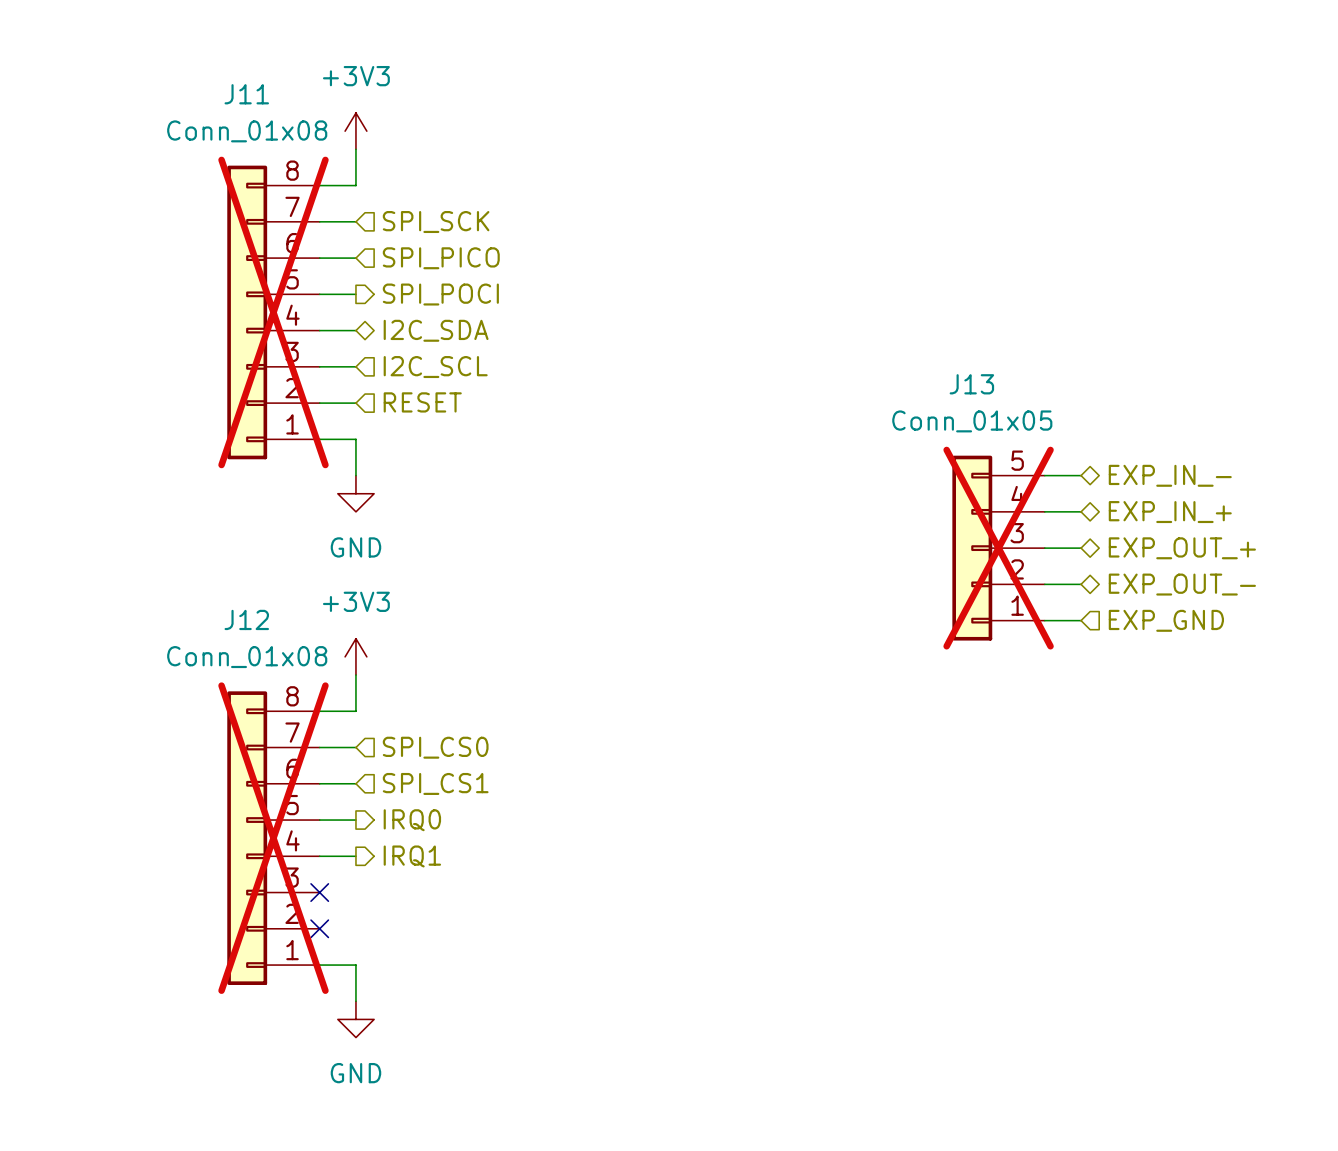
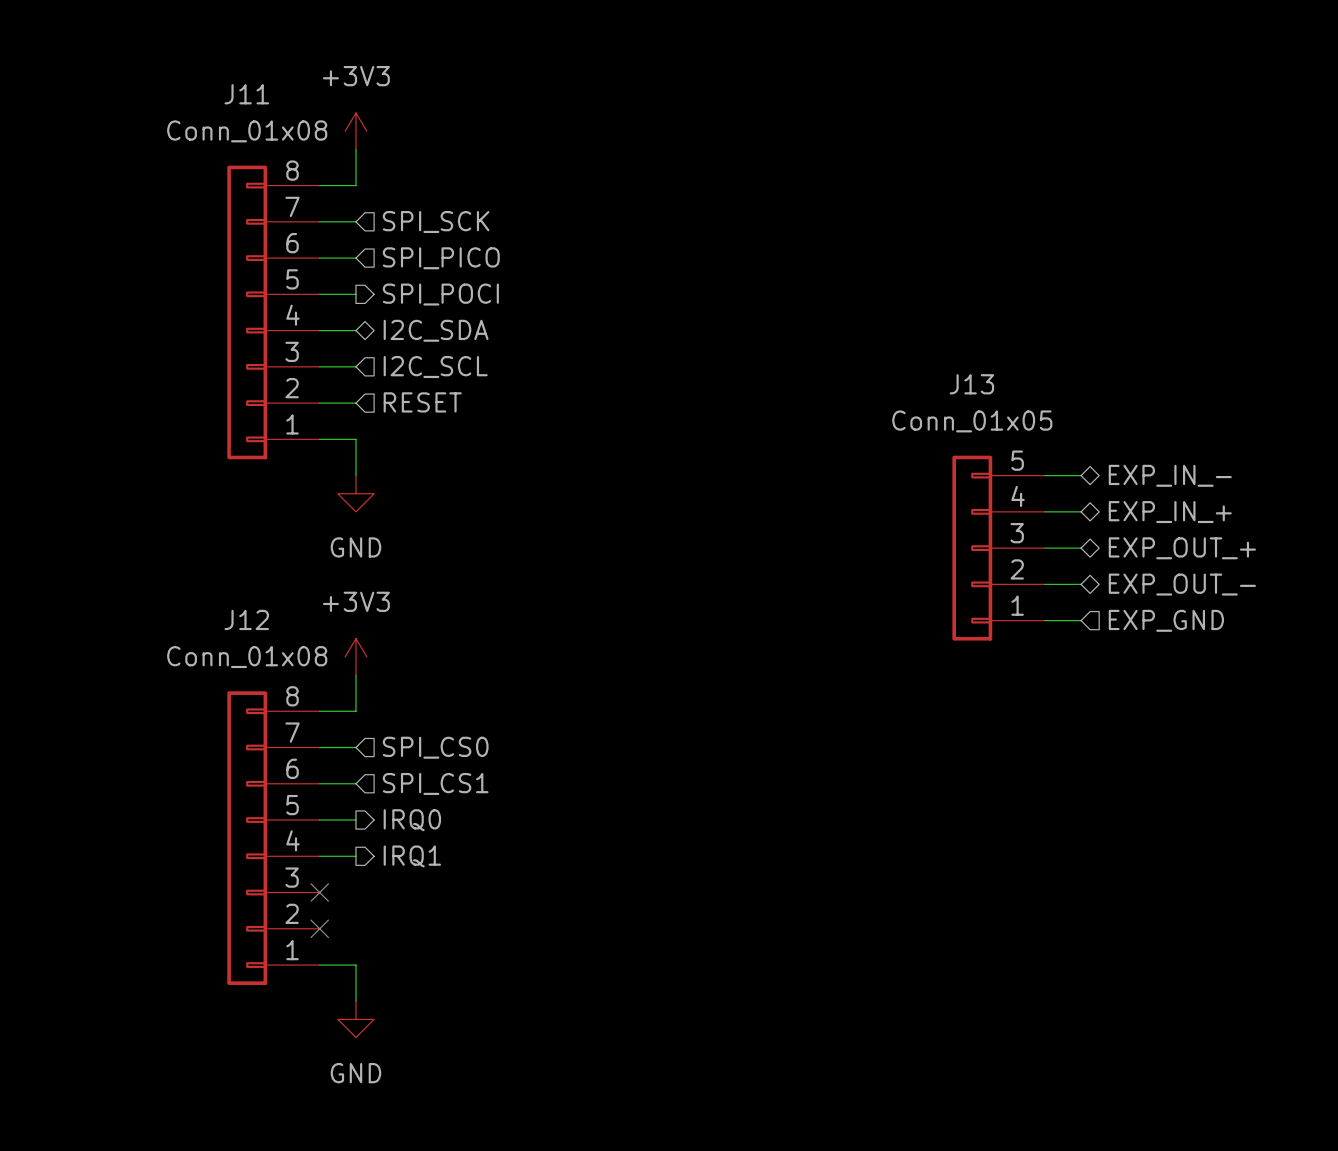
J11 do-not-place cross: (273, 312) -> none
J13 do-not-place cross: (998, 548) -> none
J12 do-not-place cross: (273, 838) -> none

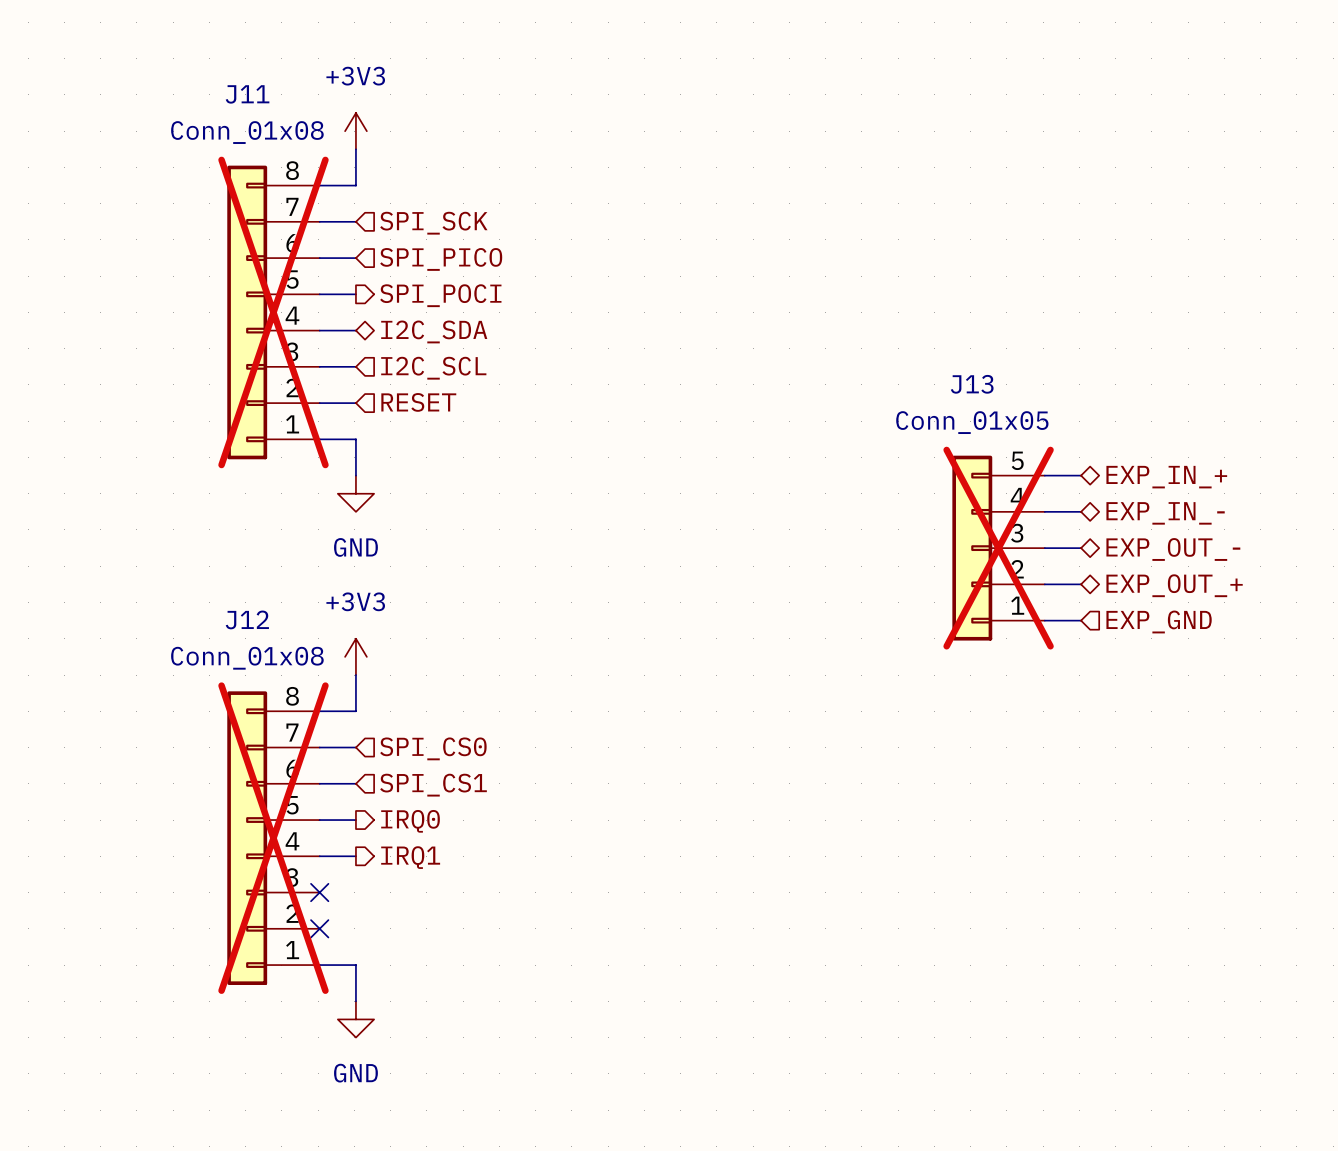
J11 do-not-place cross: none -> (273, 312)
hierarchical label: EXP_IN_- (1170, 475) -> EXP_IN_+ (1166, 477)
hierarchical label: EXP_IN_+ (1170, 512) -> EXP_IN_- (1165, 513)
J13 do-not-place cross: none -> (998, 548)
hierarchical label: EXP_OUT_+ (1182, 548) -> EXP_OUT_- (1173, 549)
hierarchical label: EXP_OUT_- (1182, 584) -> EXP_OUT_+ (1174, 585)
J12 do-not-place cross: none -> (273, 838)

